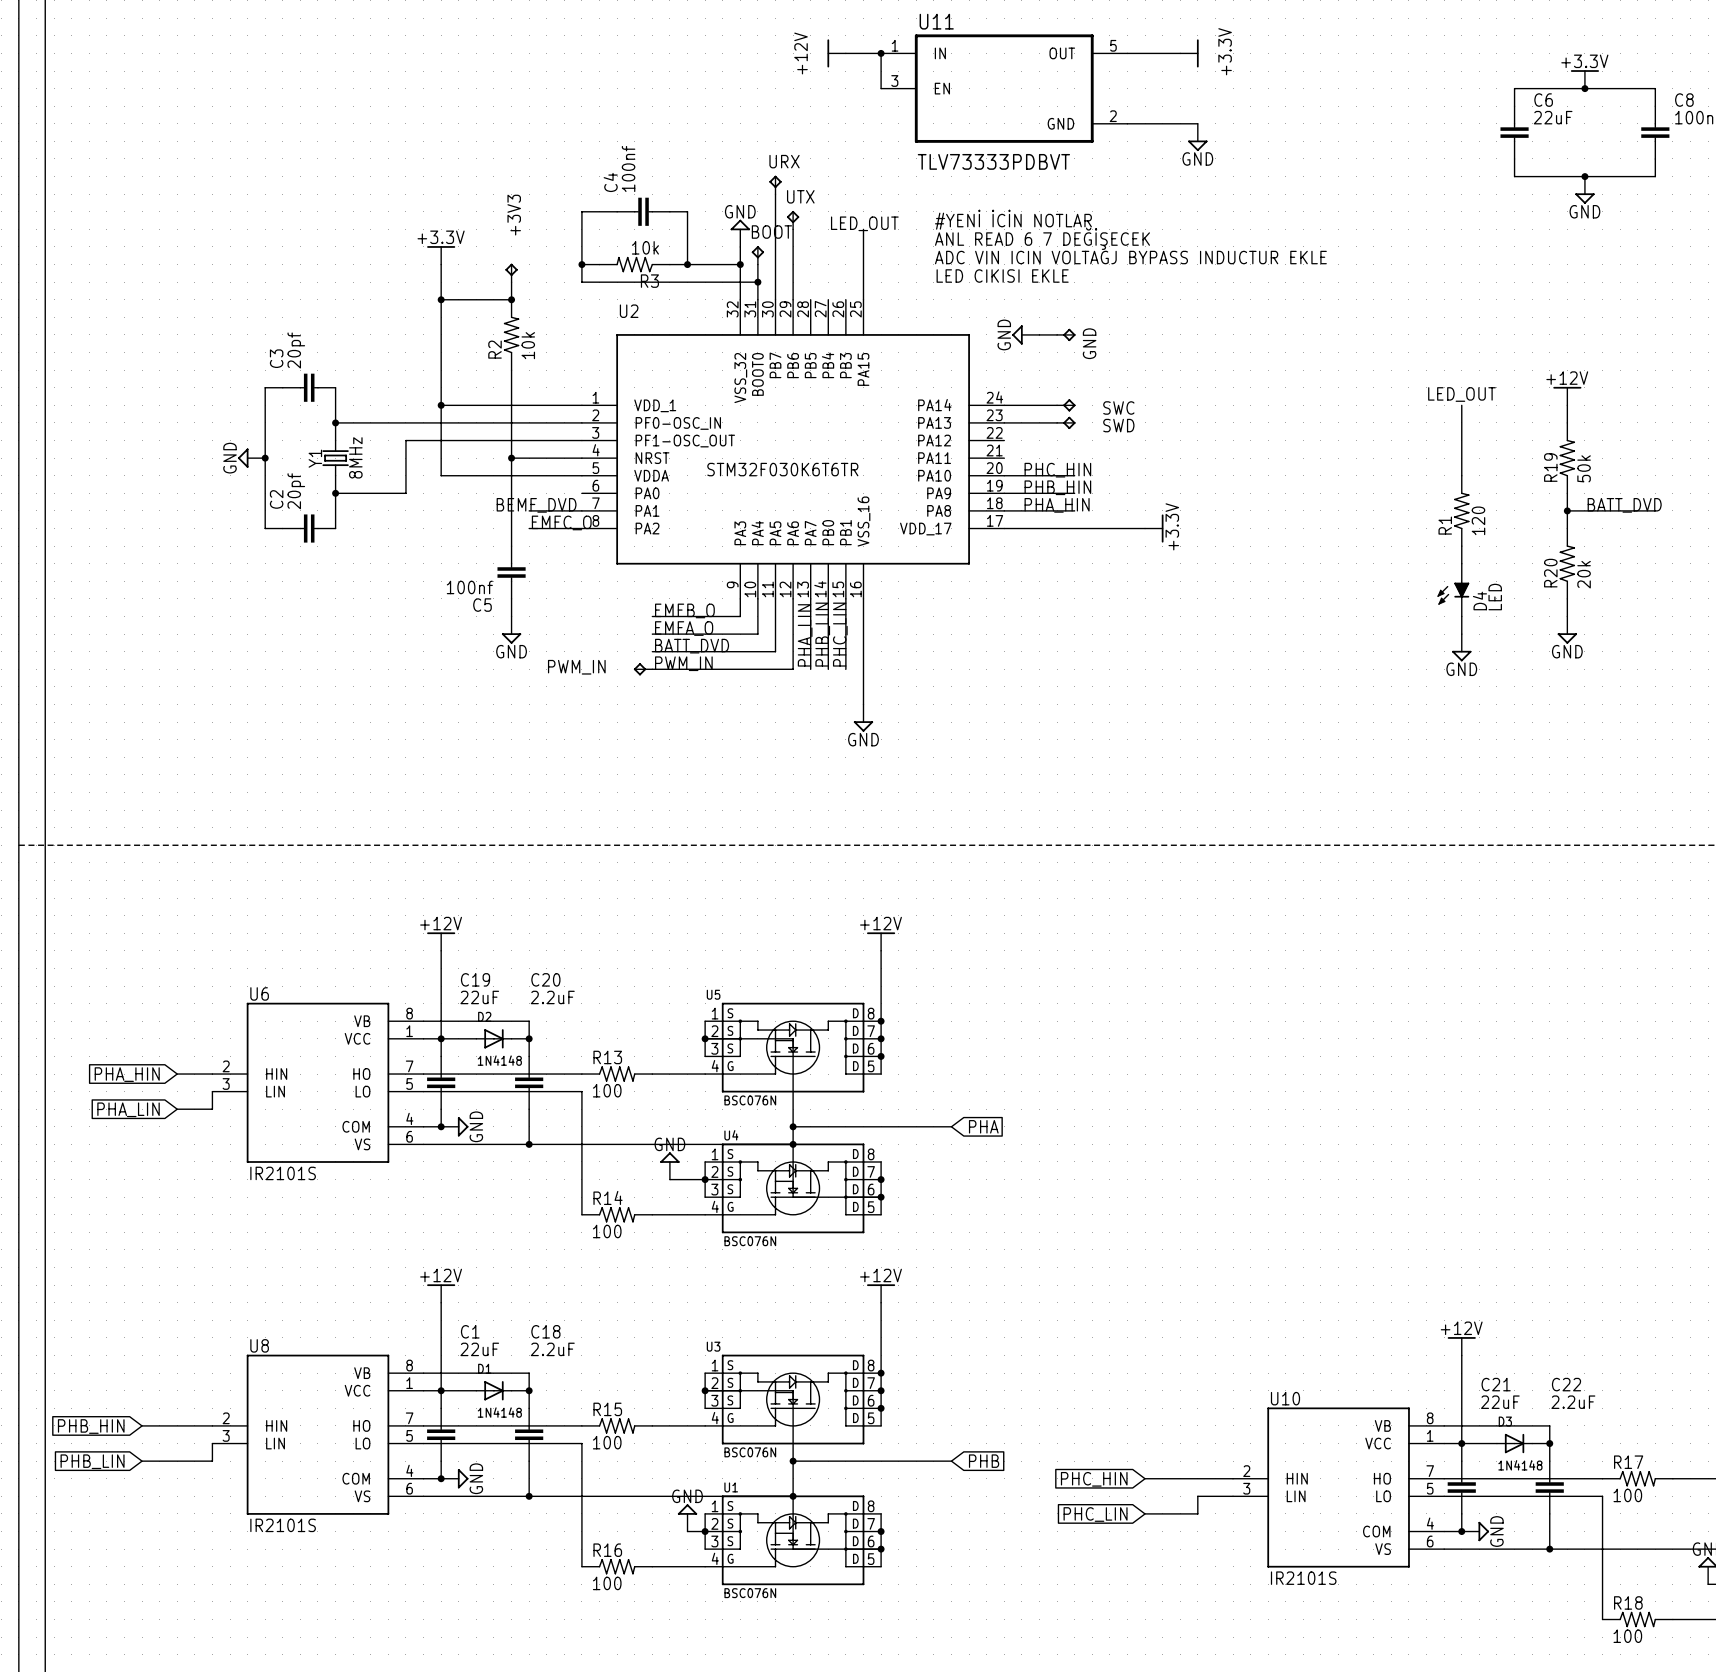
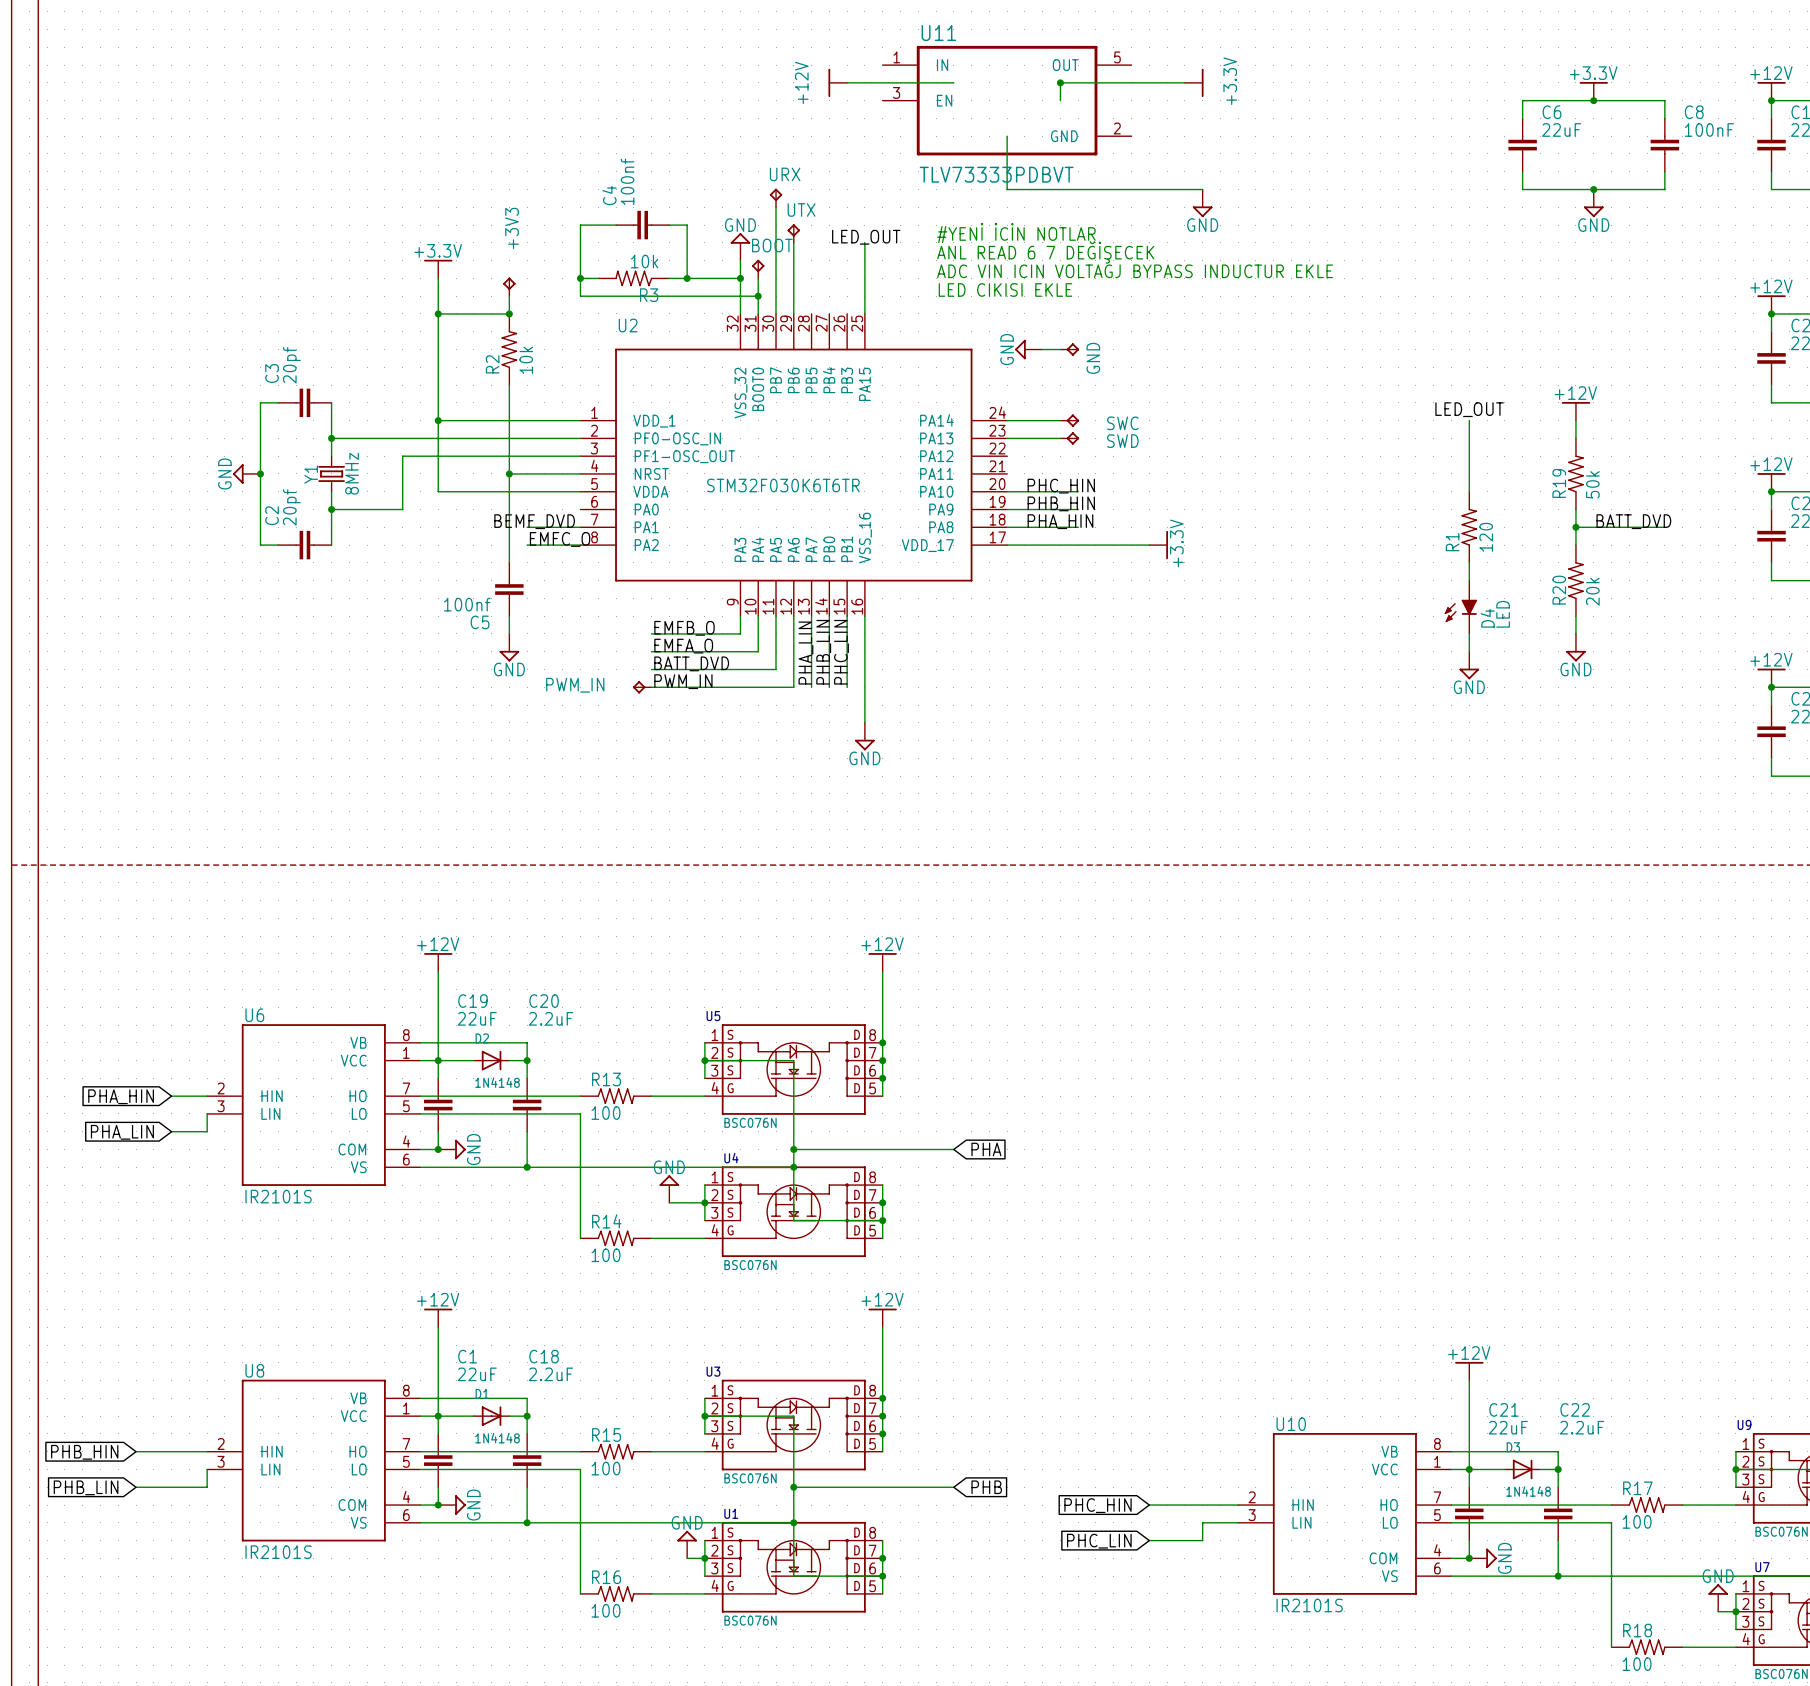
power symbol position: +12V (836, 53) -> +12V (837, 82)
wire: (845, 53) (881, 53) (881, 88) -> none
junction: (881, 53) -> none
wire: (1127, 53) (1180, 53) -> none
power symbol position: +3.3V (1189, 53) -> +3.3V (1194, 82)
wire: none -> (847, 82) (953, 82)
junction: none -> (1060, 82)
wire: none -> (1184, 82) (1060, 82) (1060, 100)
wire: none -> (1007, 136) (1007, 189) (1202, 189)
wire: (1127, 123) (1197, 123) -> none
power symbol position: GND (1197, 137) -> GND (1202, 203)

